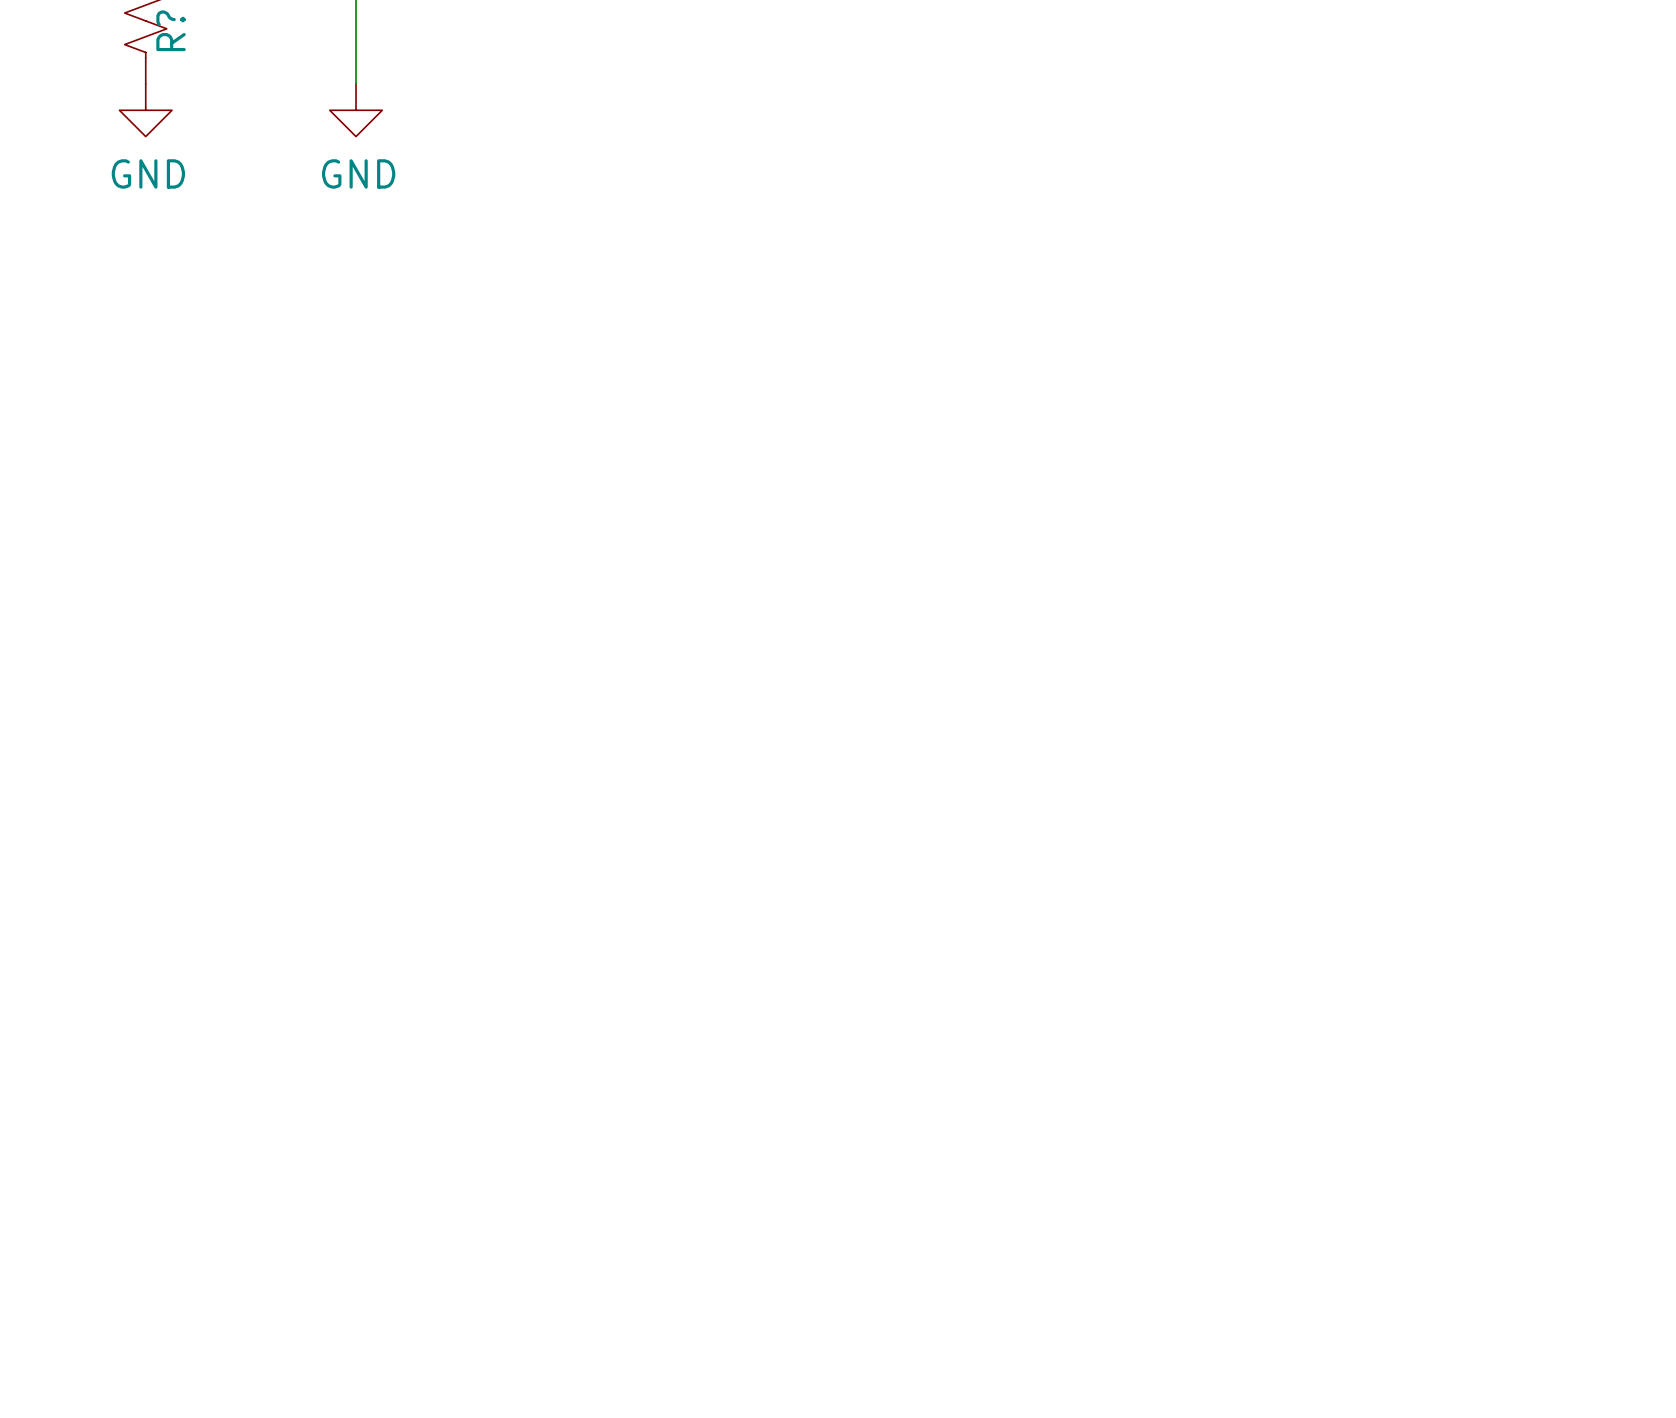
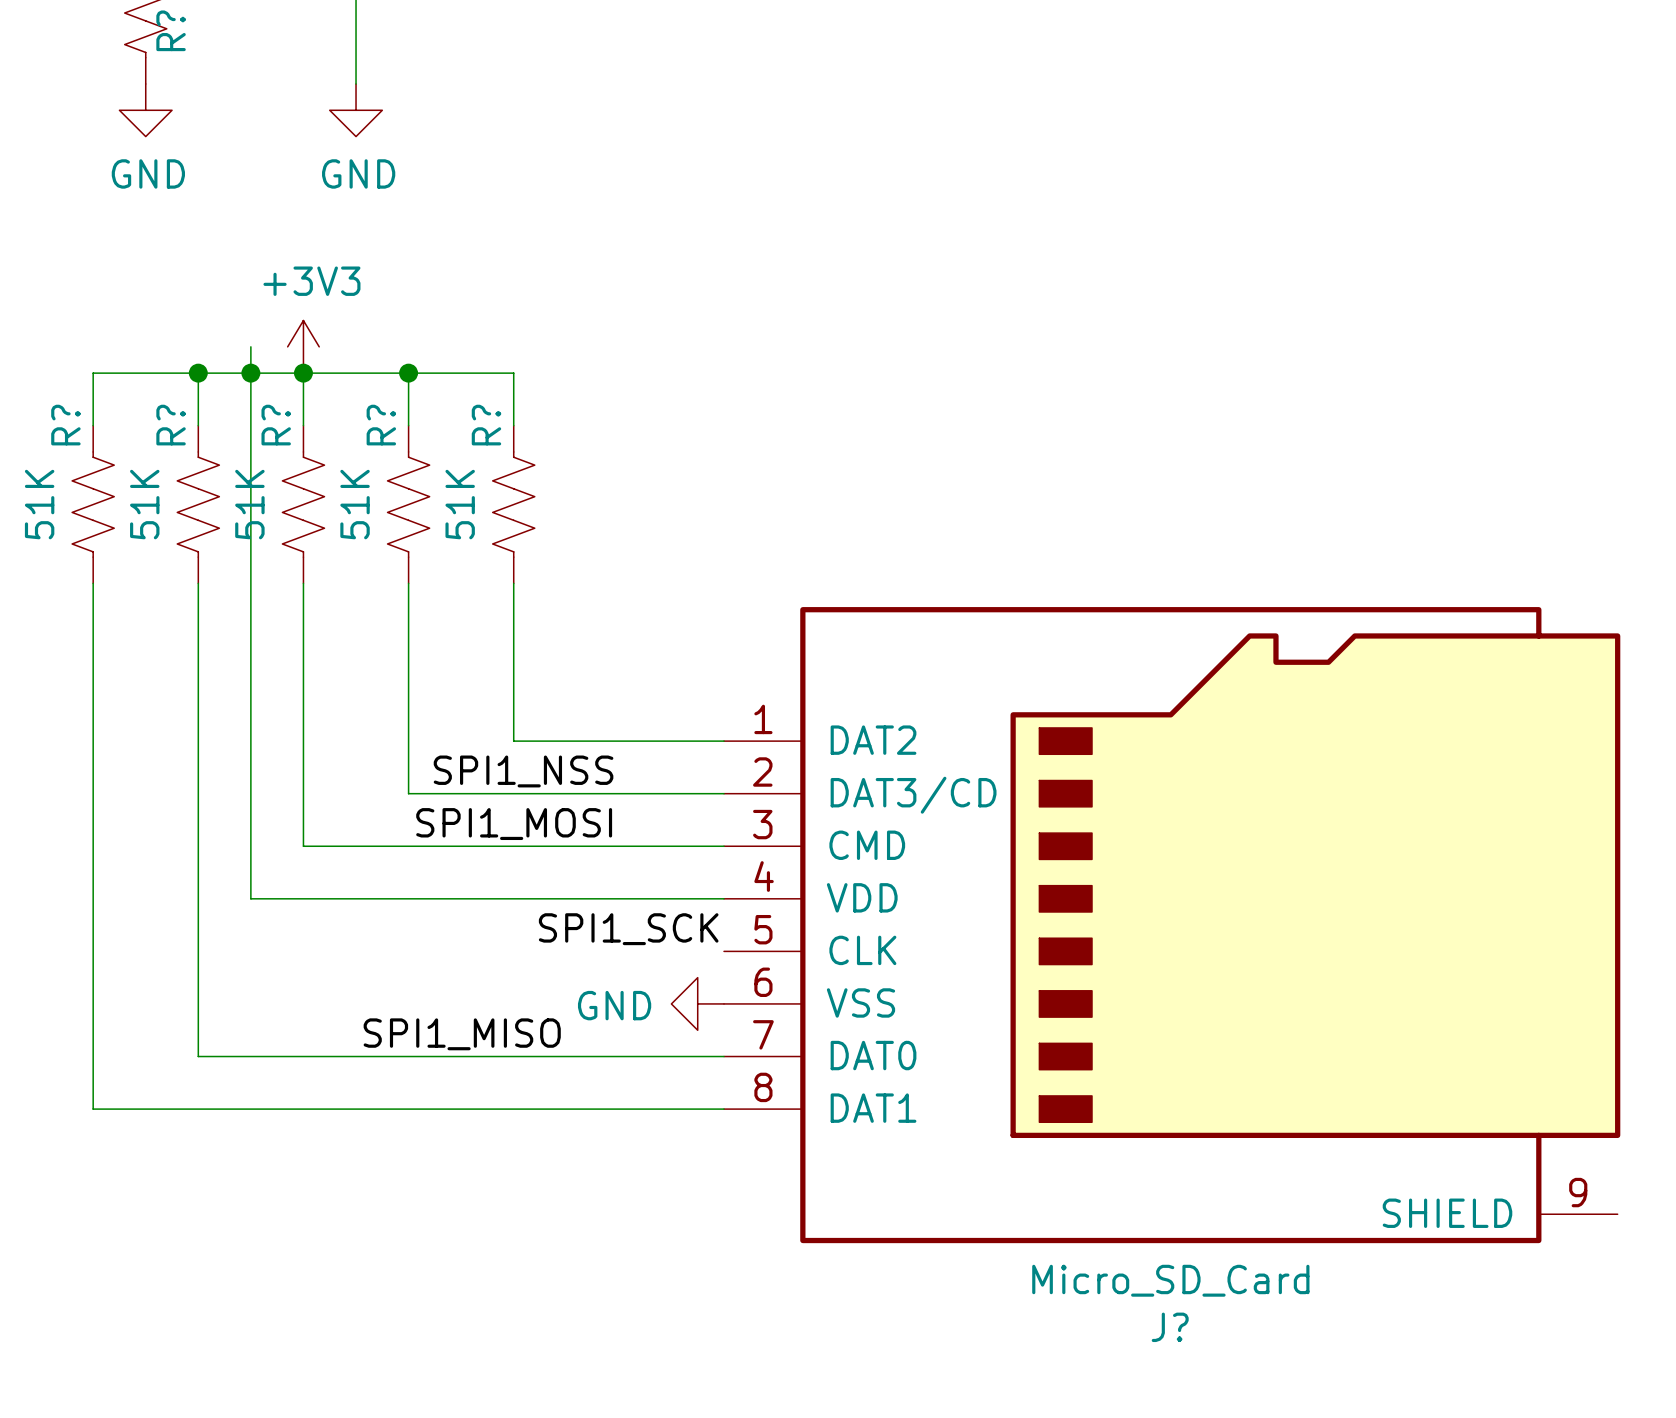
wire: none -> (250, 346) (250, 898) (724, 898)
power symbol: none -> +3V3 (303, 346)
wire: none -> (198, 373) (198, 425)
junction: none -> (198, 373)
junction: none -> (250, 373)
wire: none -> (303, 373) (303, 425)
junction: none -> (303, 373)
wire: none -> (408, 373) (408, 425)
junction: none -> (408, 373)
wire: none -> (93, 425) (93, 373) (513, 373) (513, 425)
R?: none -> 51K (93, 504)
R?: none -> 51K (198, 504)
R?: none -> 51K (303, 504)
R?: none -> 51K (408, 504)
R?: none -> 51K (513, 504)
wire: none -> (93, 583) (93, 1109) (724, 1109)
wire: none -> (198, 583) (198, 1056) (724, 1056)
wire: none -> (303, 583) (303, 846) (724, 846)
wire: none -> (408, 583) (408, 793) (724, 793)
wire: none -> (513, 583) (513, 741) (724, 741)
label: none -> SPI1_NSS (523, 771)
label: none -> SPI1_MOSI (514, 824)
J?: none -> Micro_SD_Card (1172, 925)
label: none -> SPI1_SCK (628, 929)
power symbol: none -> GND (697, 1003)
label: none -> SPI1_MISO (462, 1034)

